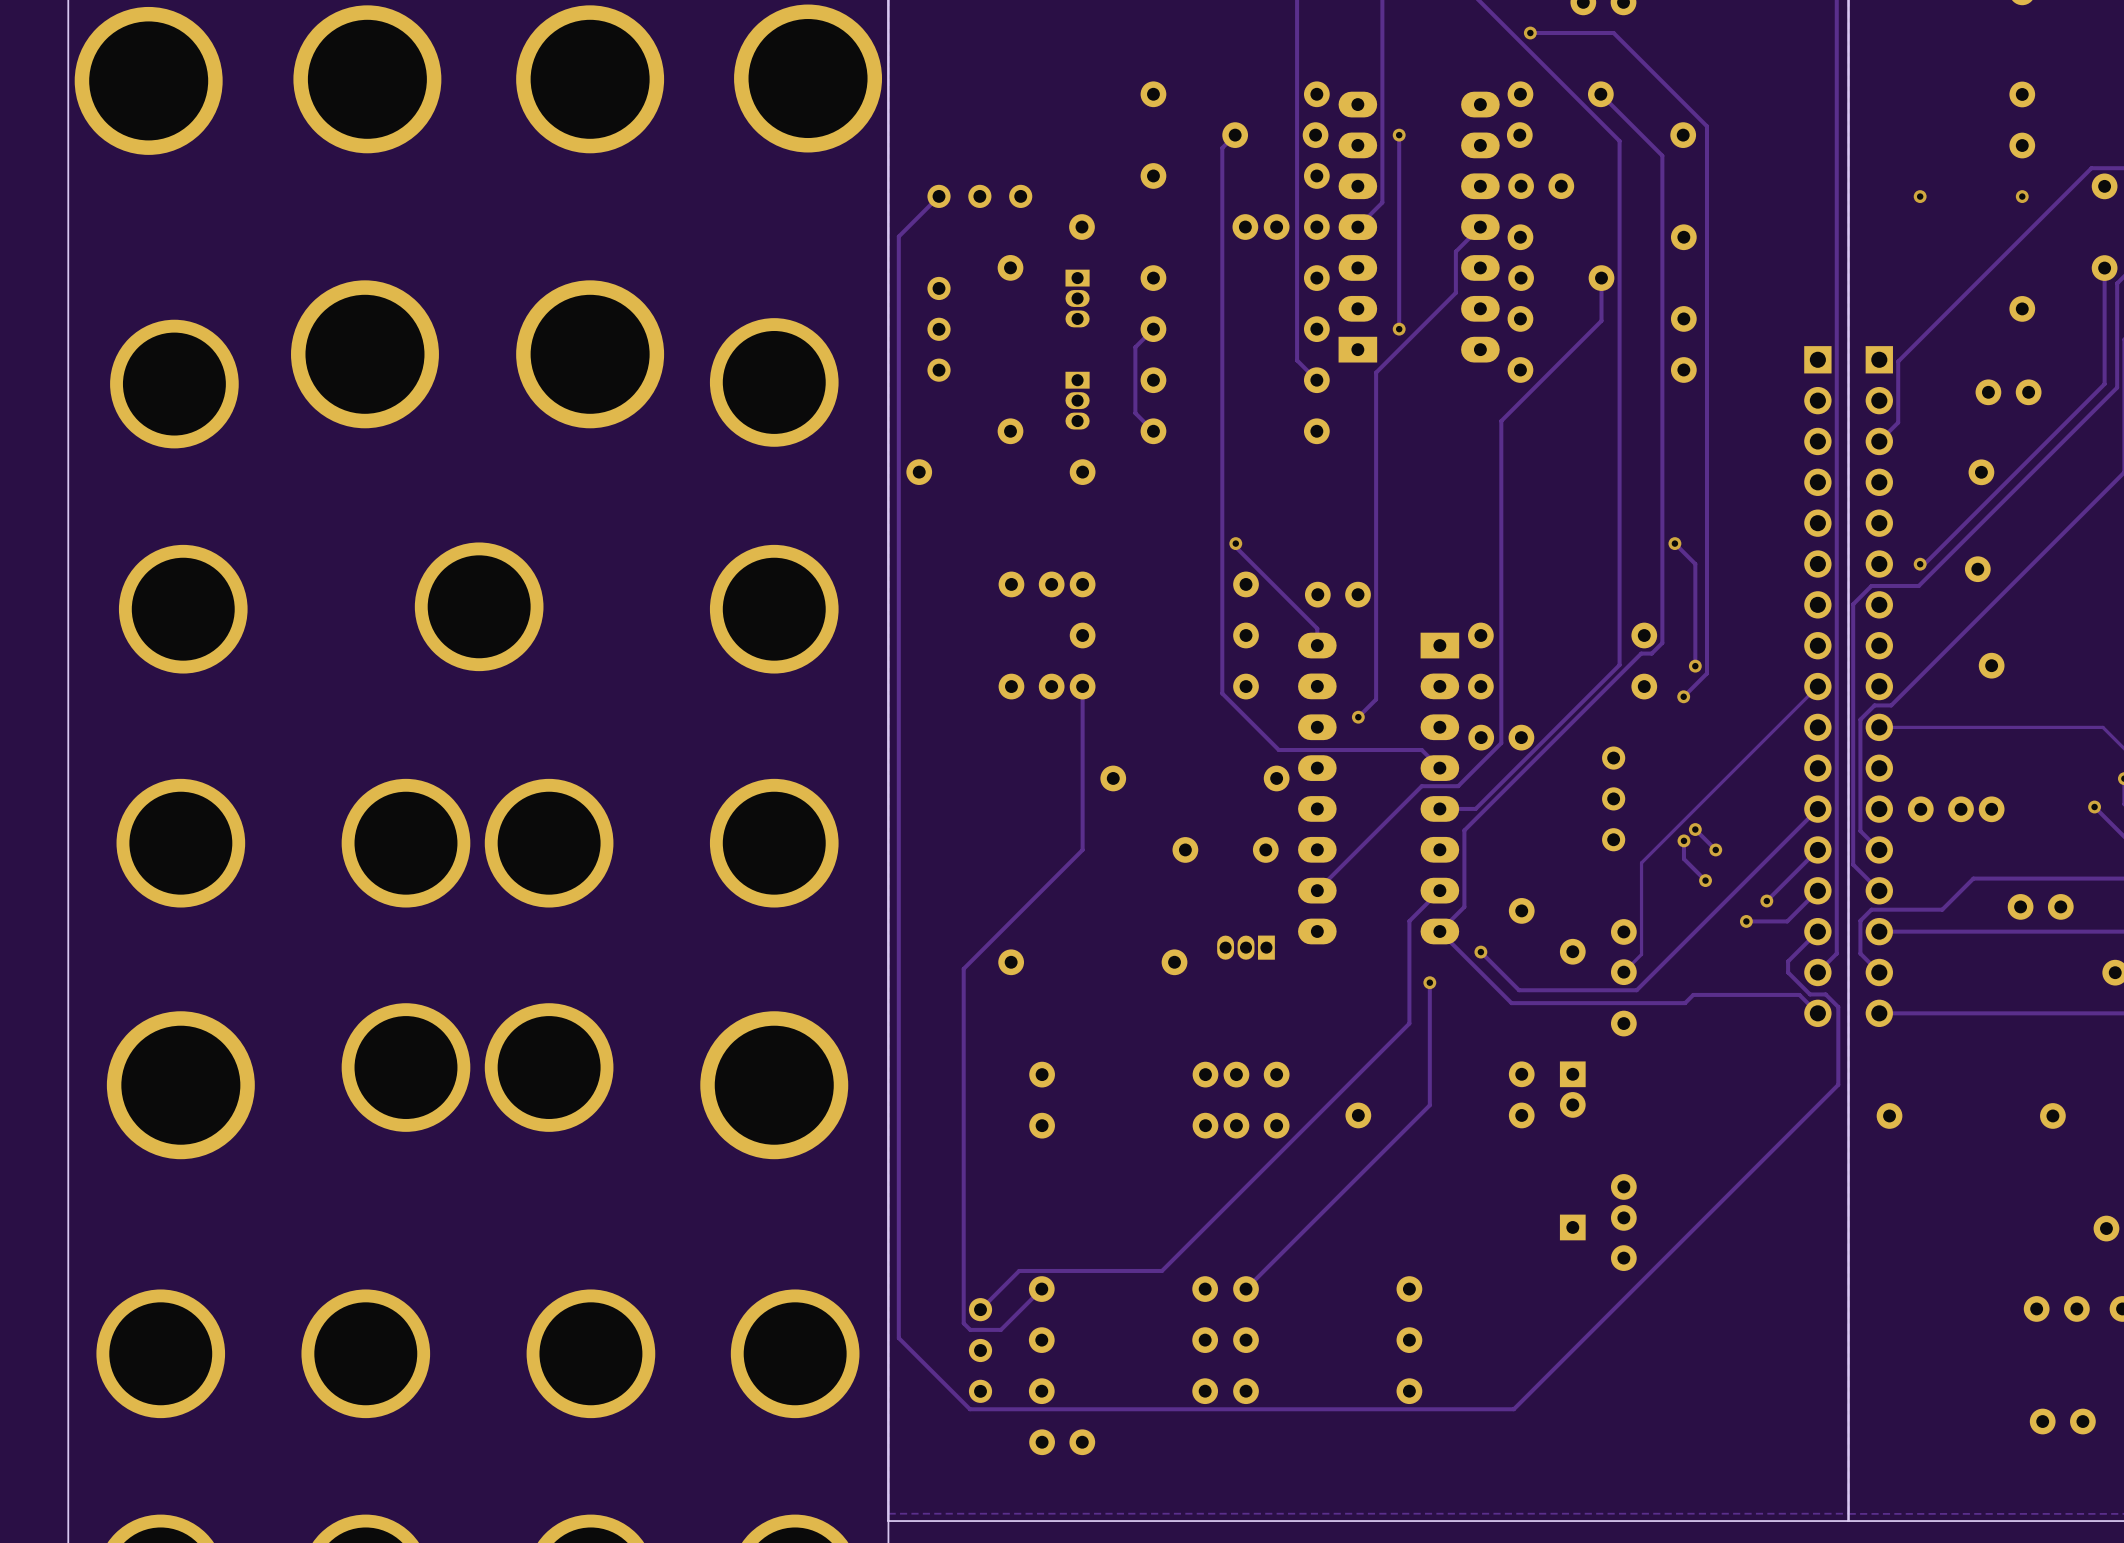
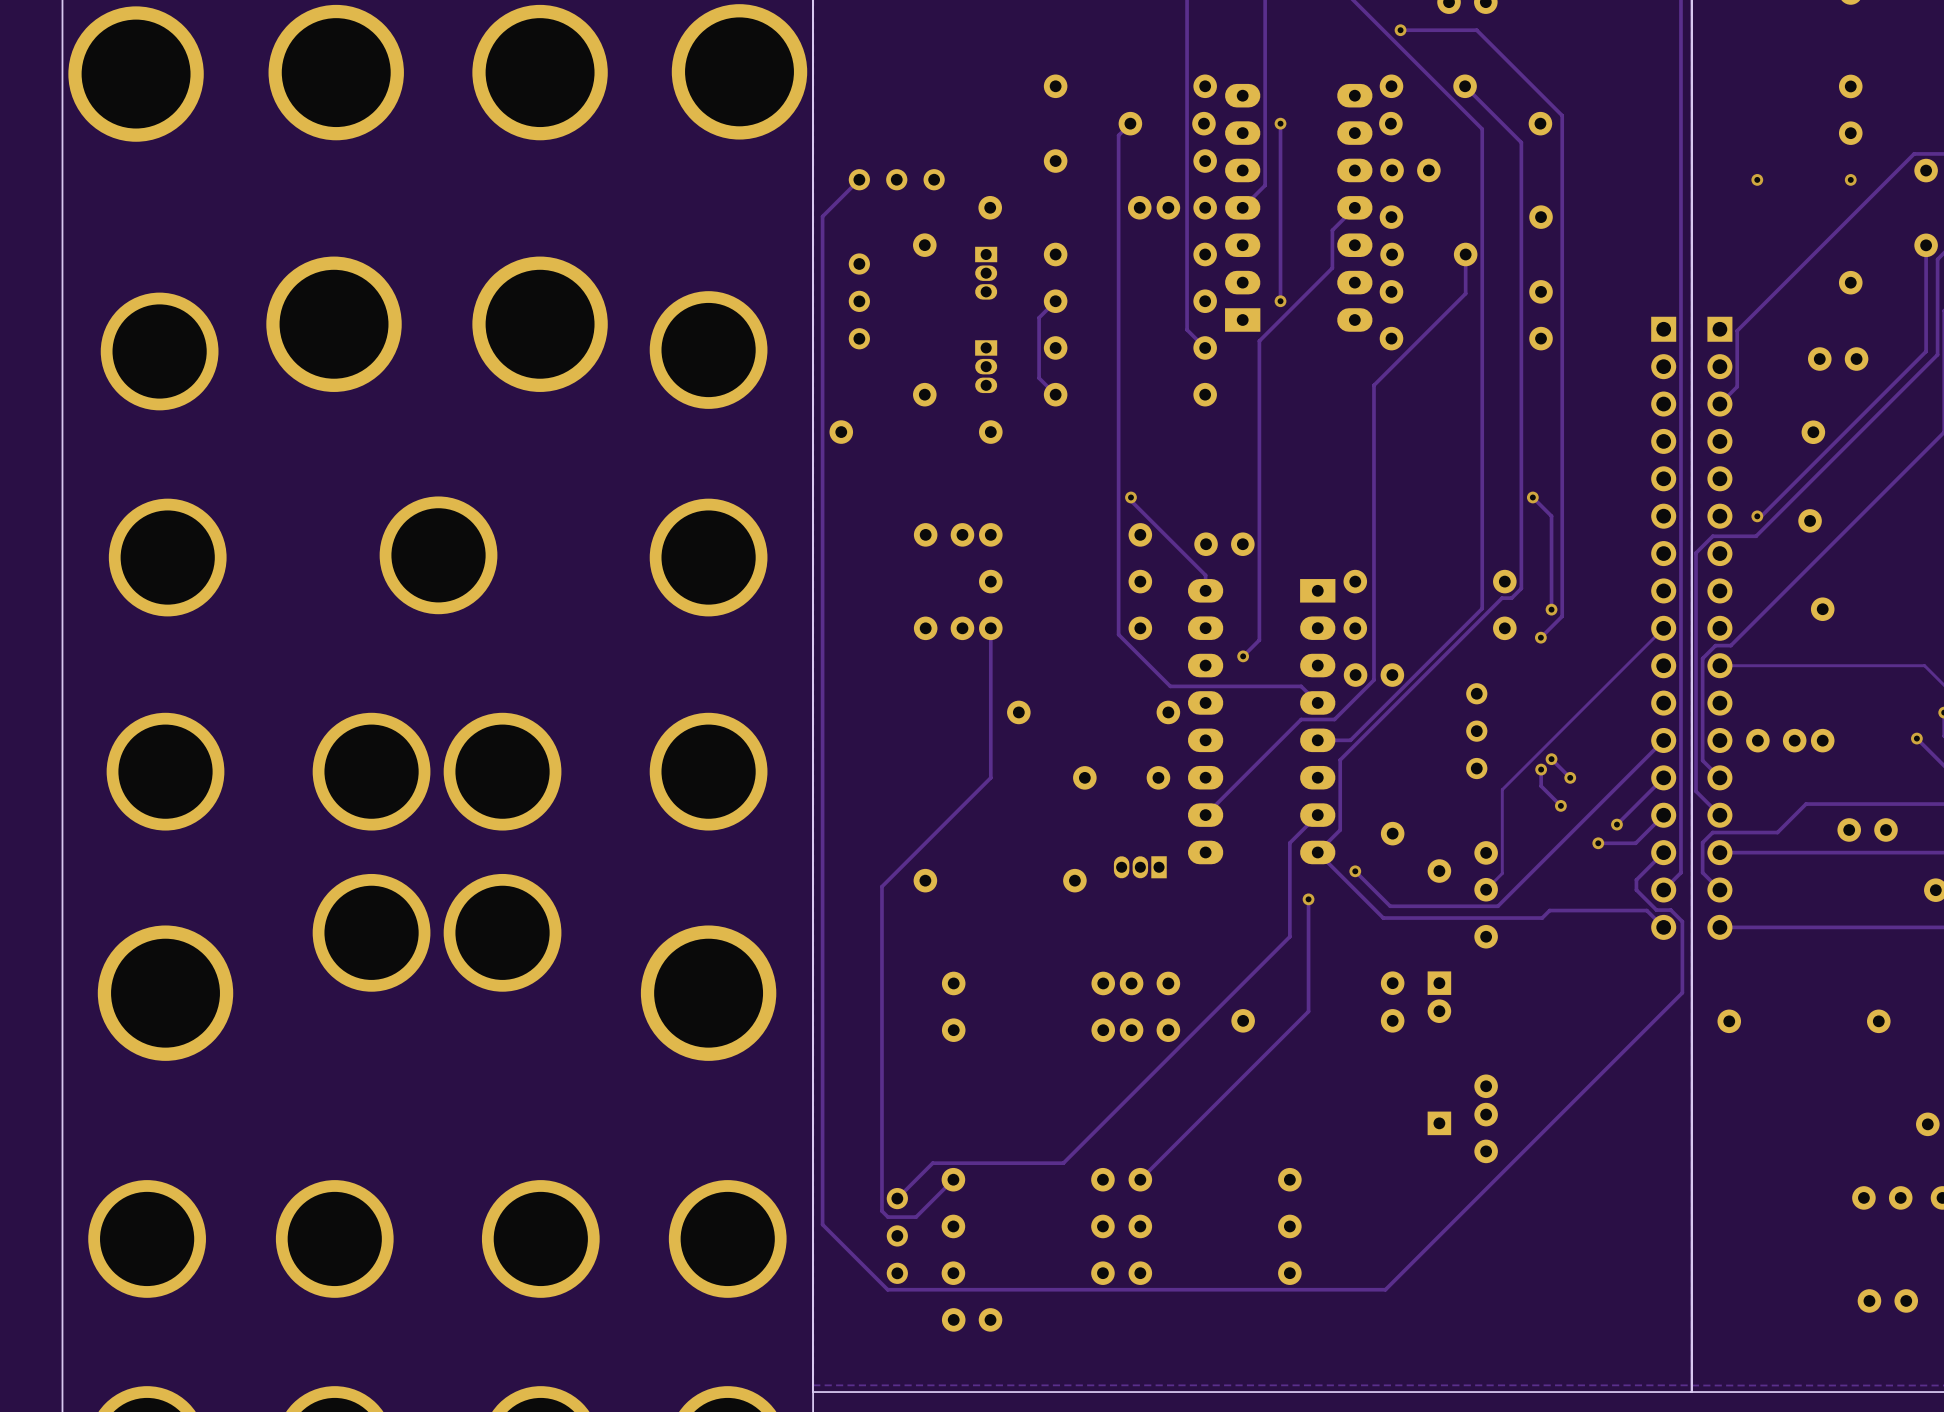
part position: (405, 1067) -> (371, 932)
part position: (549, 1067) -> (502, 932)

